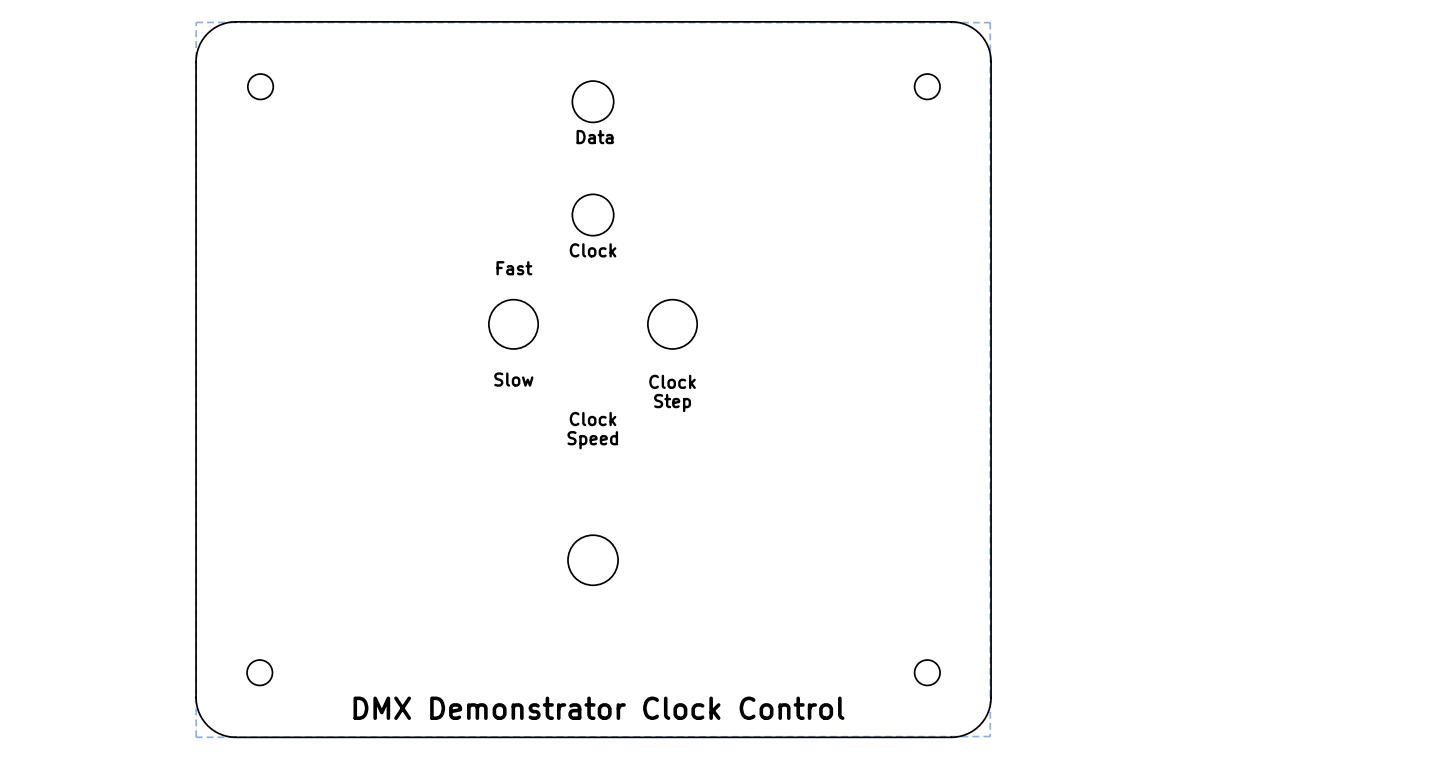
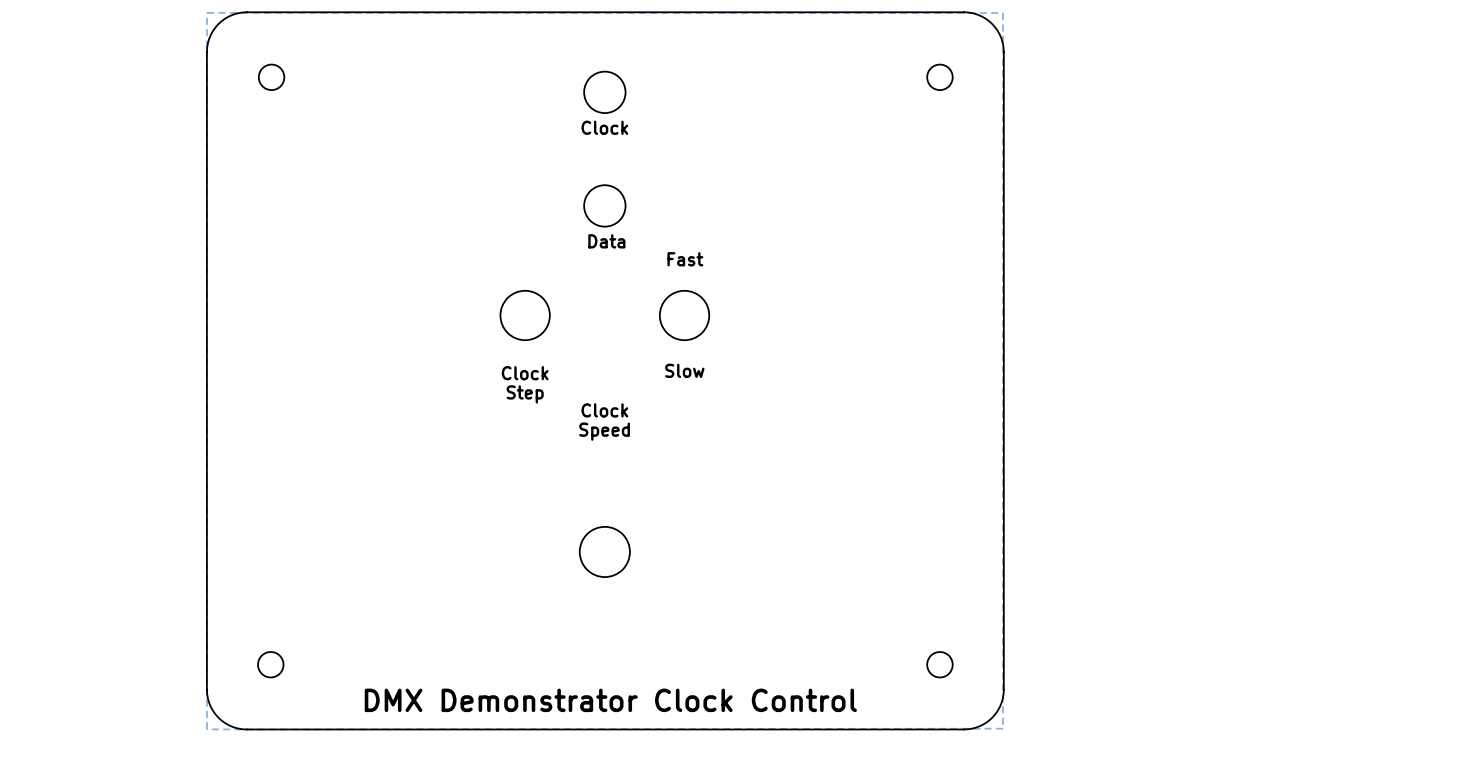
text: Data (595, 137) -> Clock (604, 127)
text: Clock (593, 250) -> Data (606, 241)
text position: Fast (514, 268) -> Fast (685, 259)
text: Slow (513, 379) -> Clock (525, 373)
text: Clock (672, 381) -> Slow (684, 370)
text position: Step (672, 403) -> Step (525, 394)

